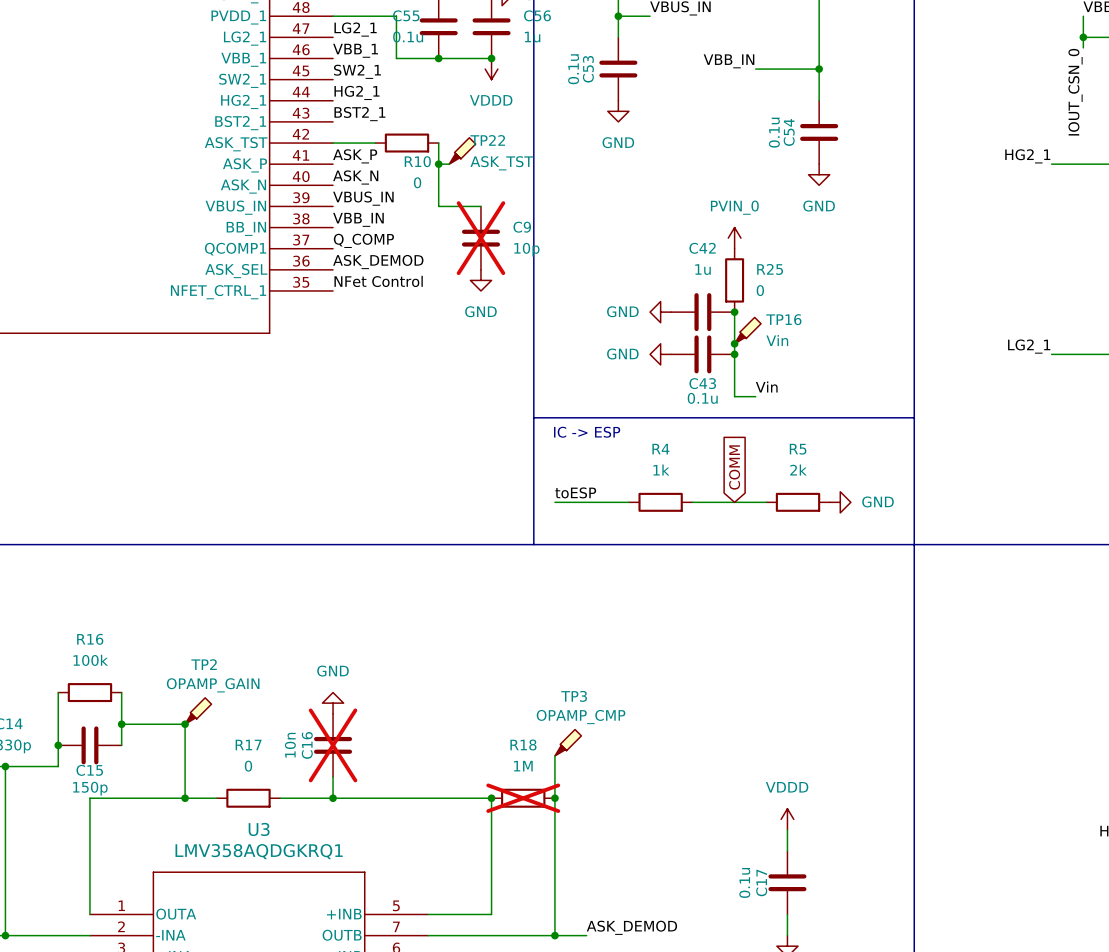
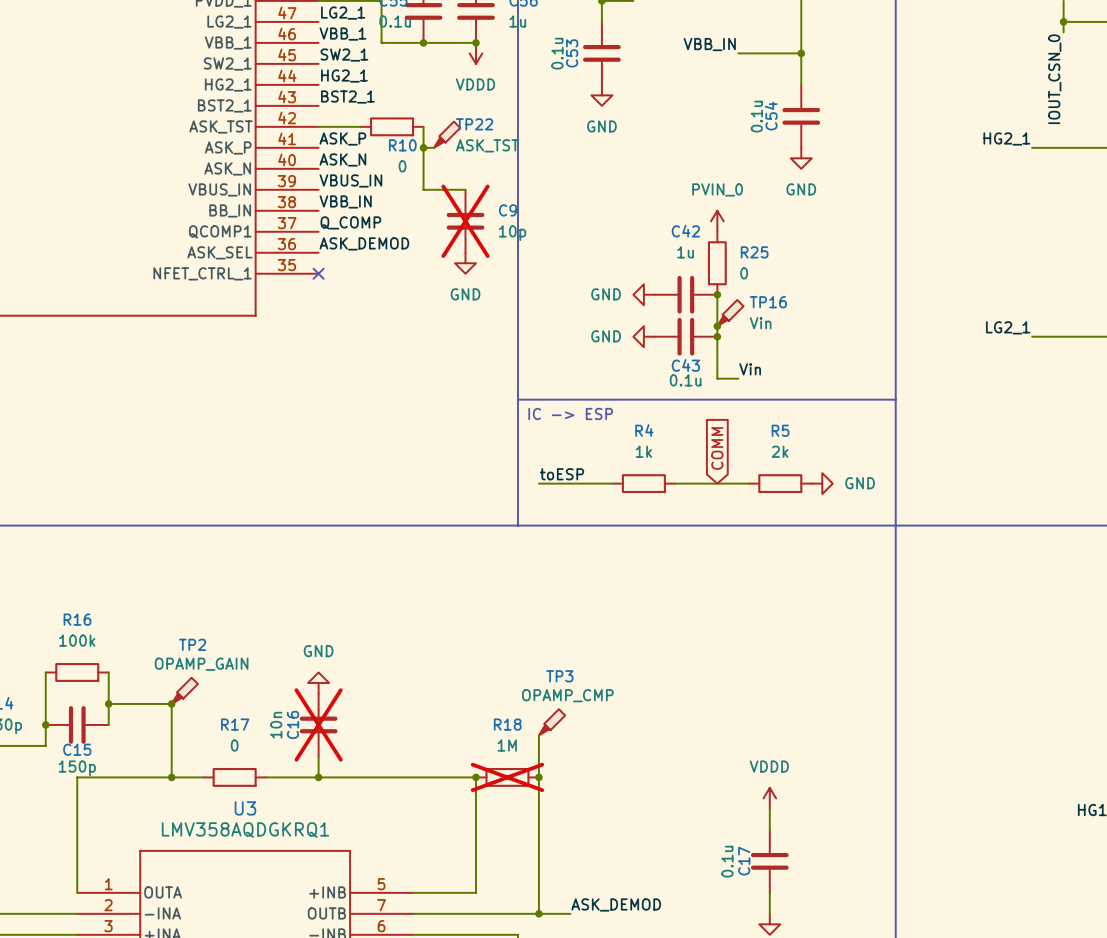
label: NFet Control (378, 281) -> none
no-connect mark: none -> (318, 273)

